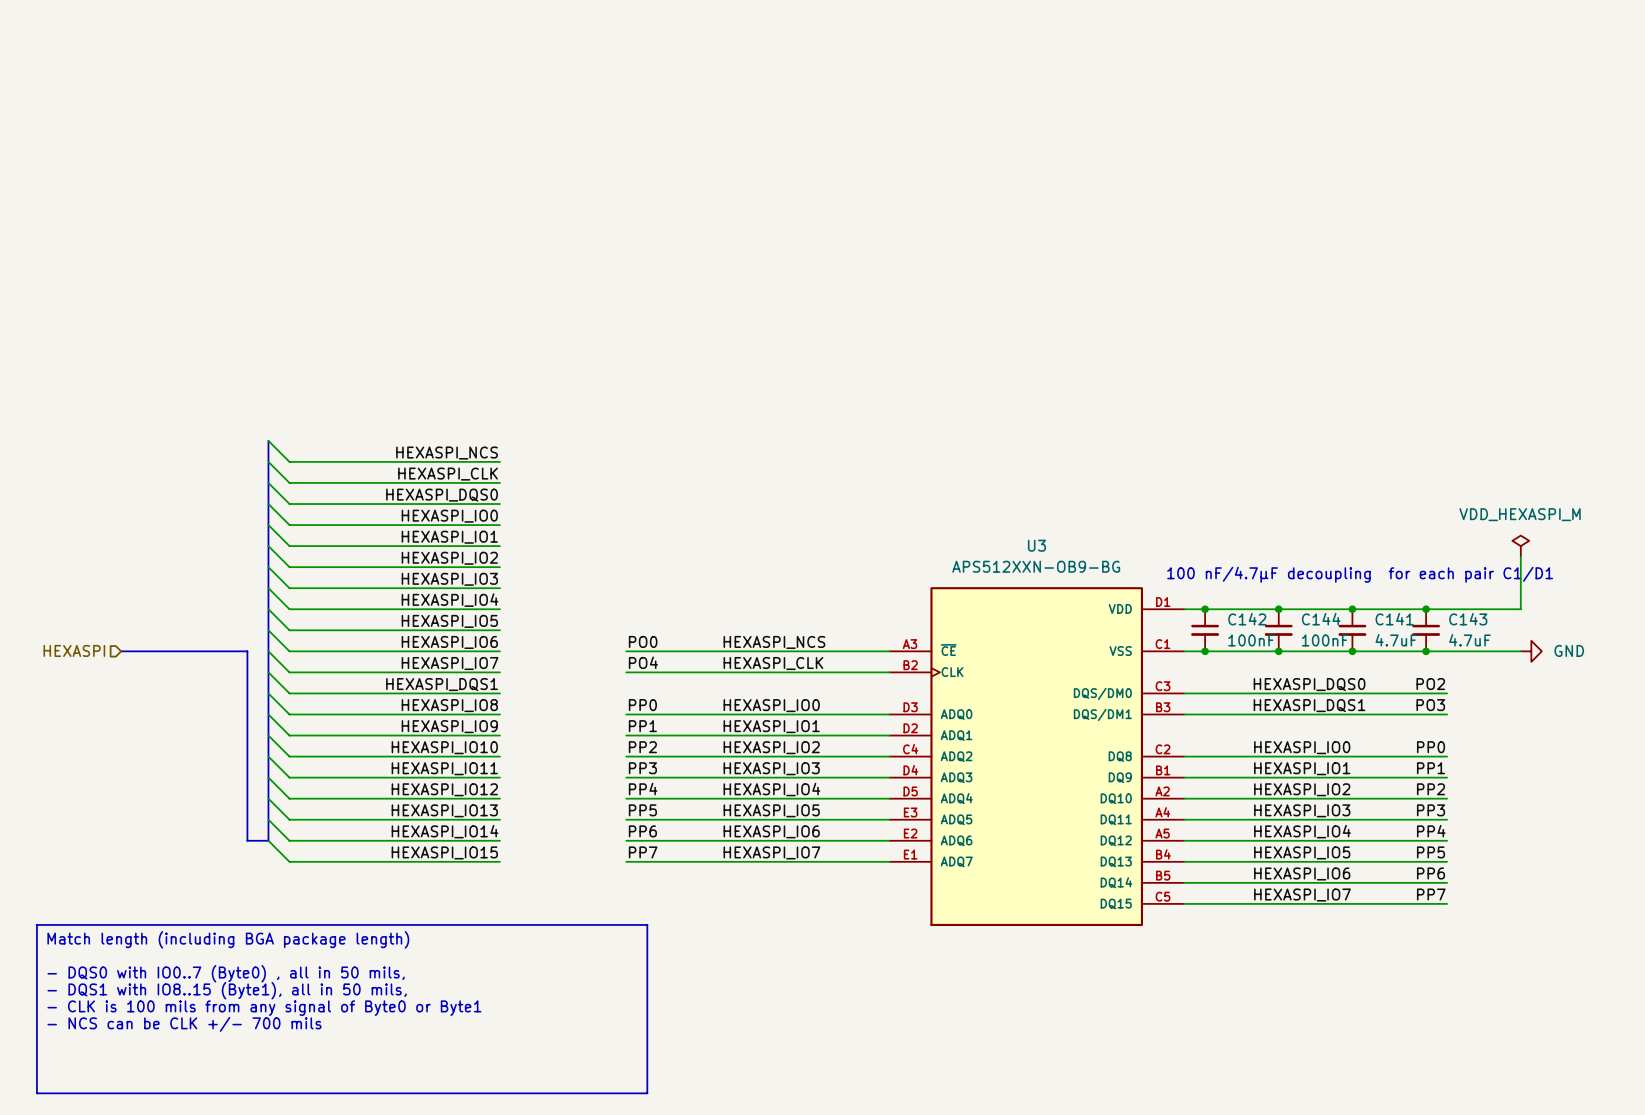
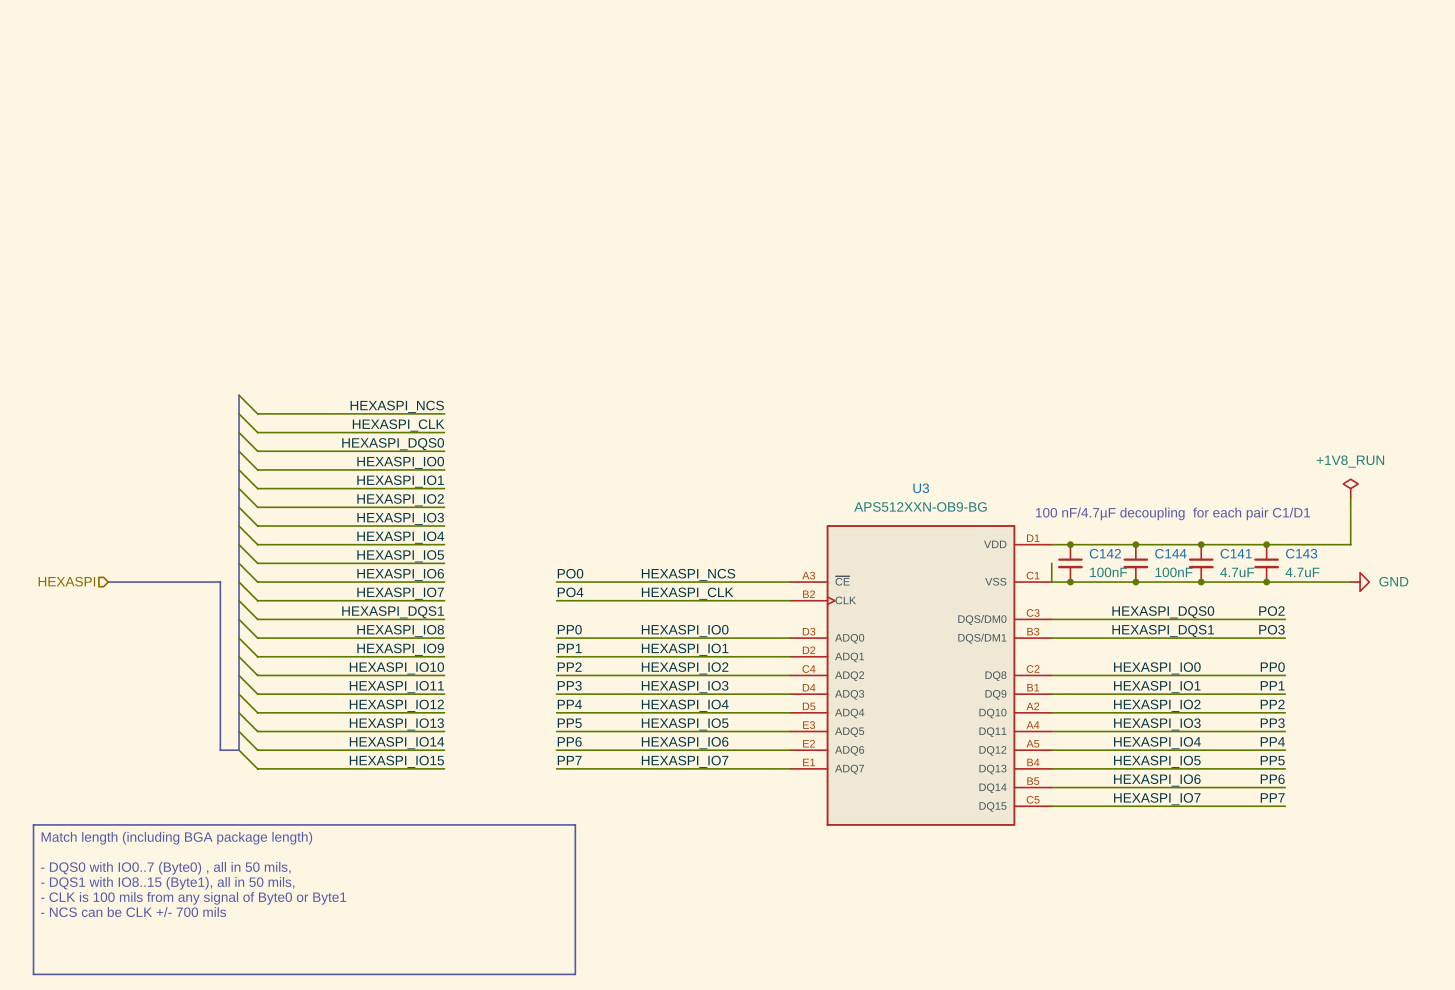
power symbol: VDD_HEXASPI_M (1520, 546) -> +1V8_RUN (1350, 488)
wire: none -> (1051, 563) (1051, 582)

